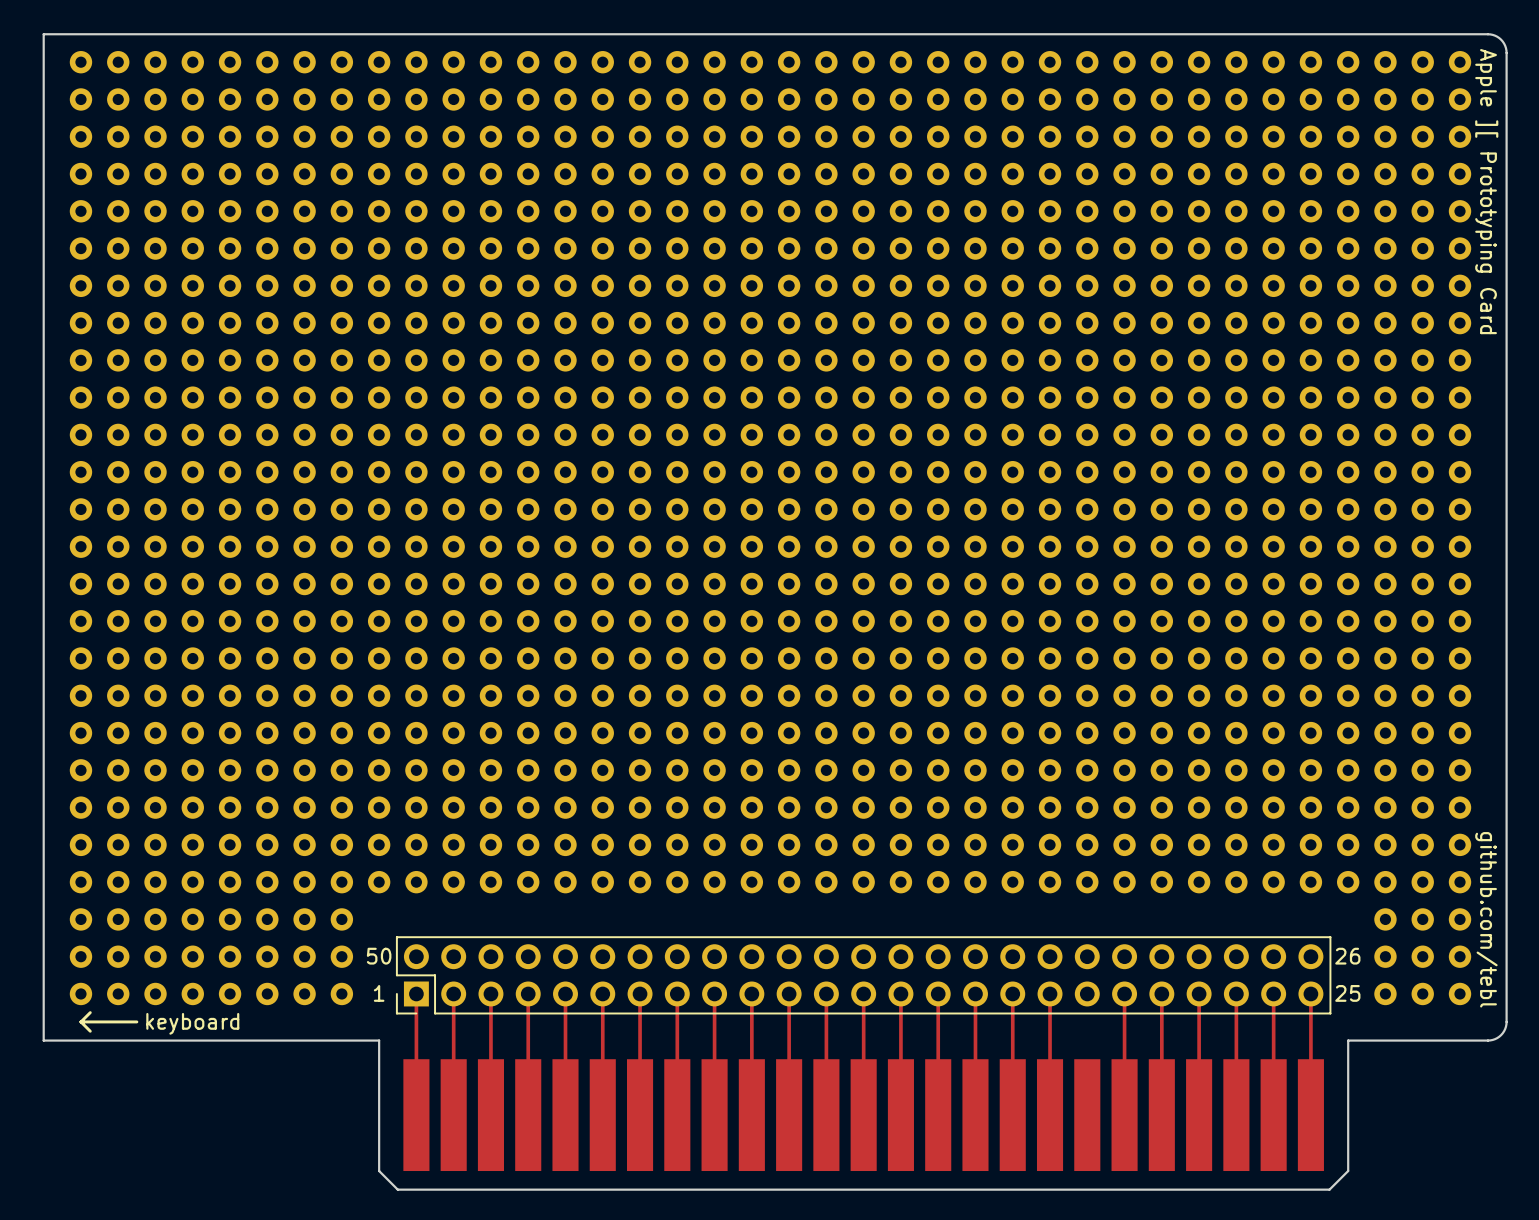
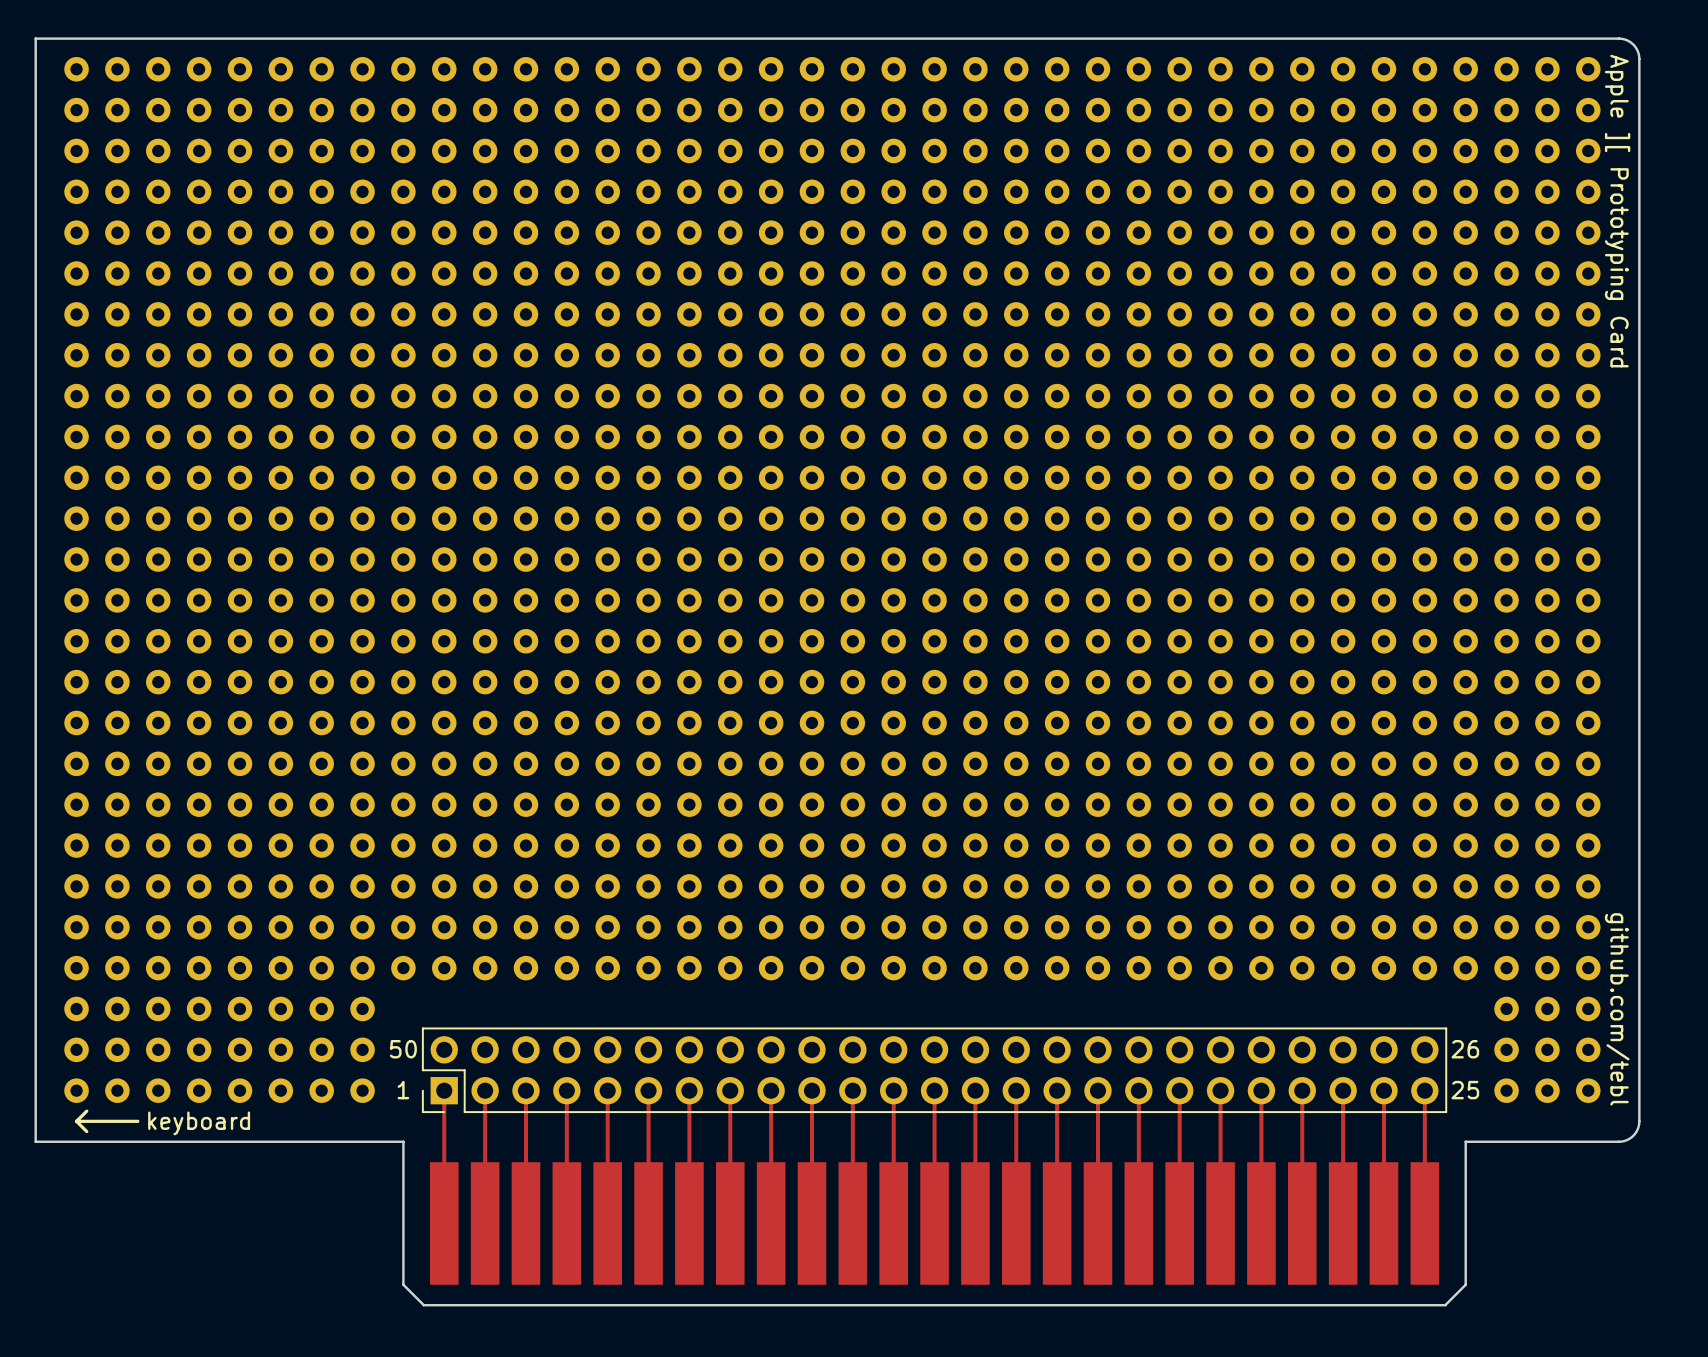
track: none -> (1179, 1090) (1179, 1223)

